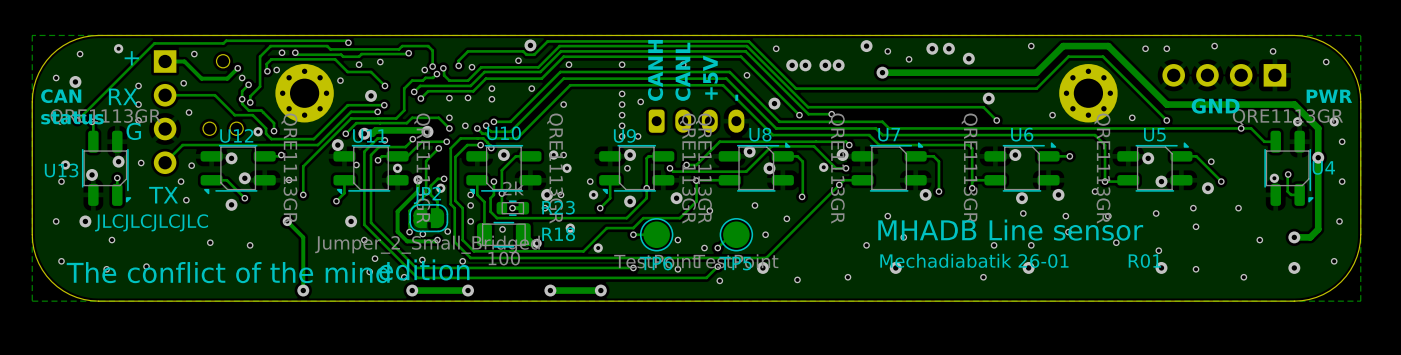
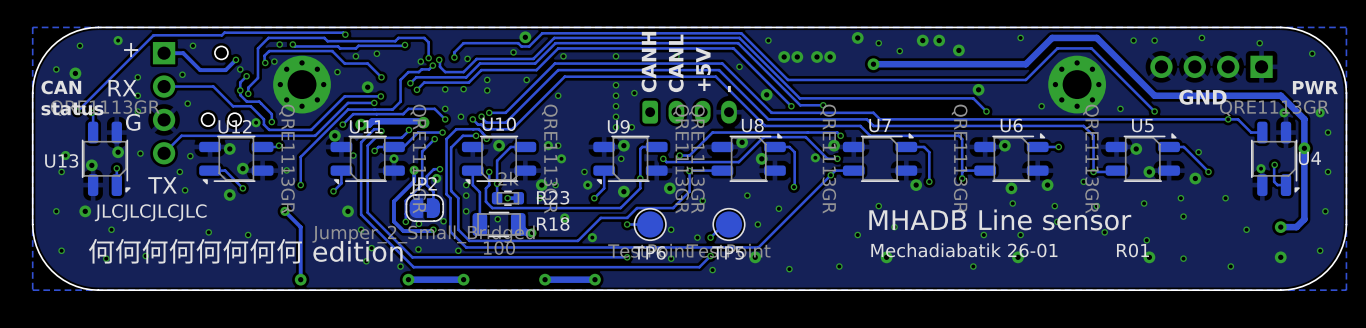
text: none -> 何何何何何何何何 (195, 251)
text position: edition (424, 269) -> edition (358, 251)
text: The conflict of the mind (228, 272) -> none

